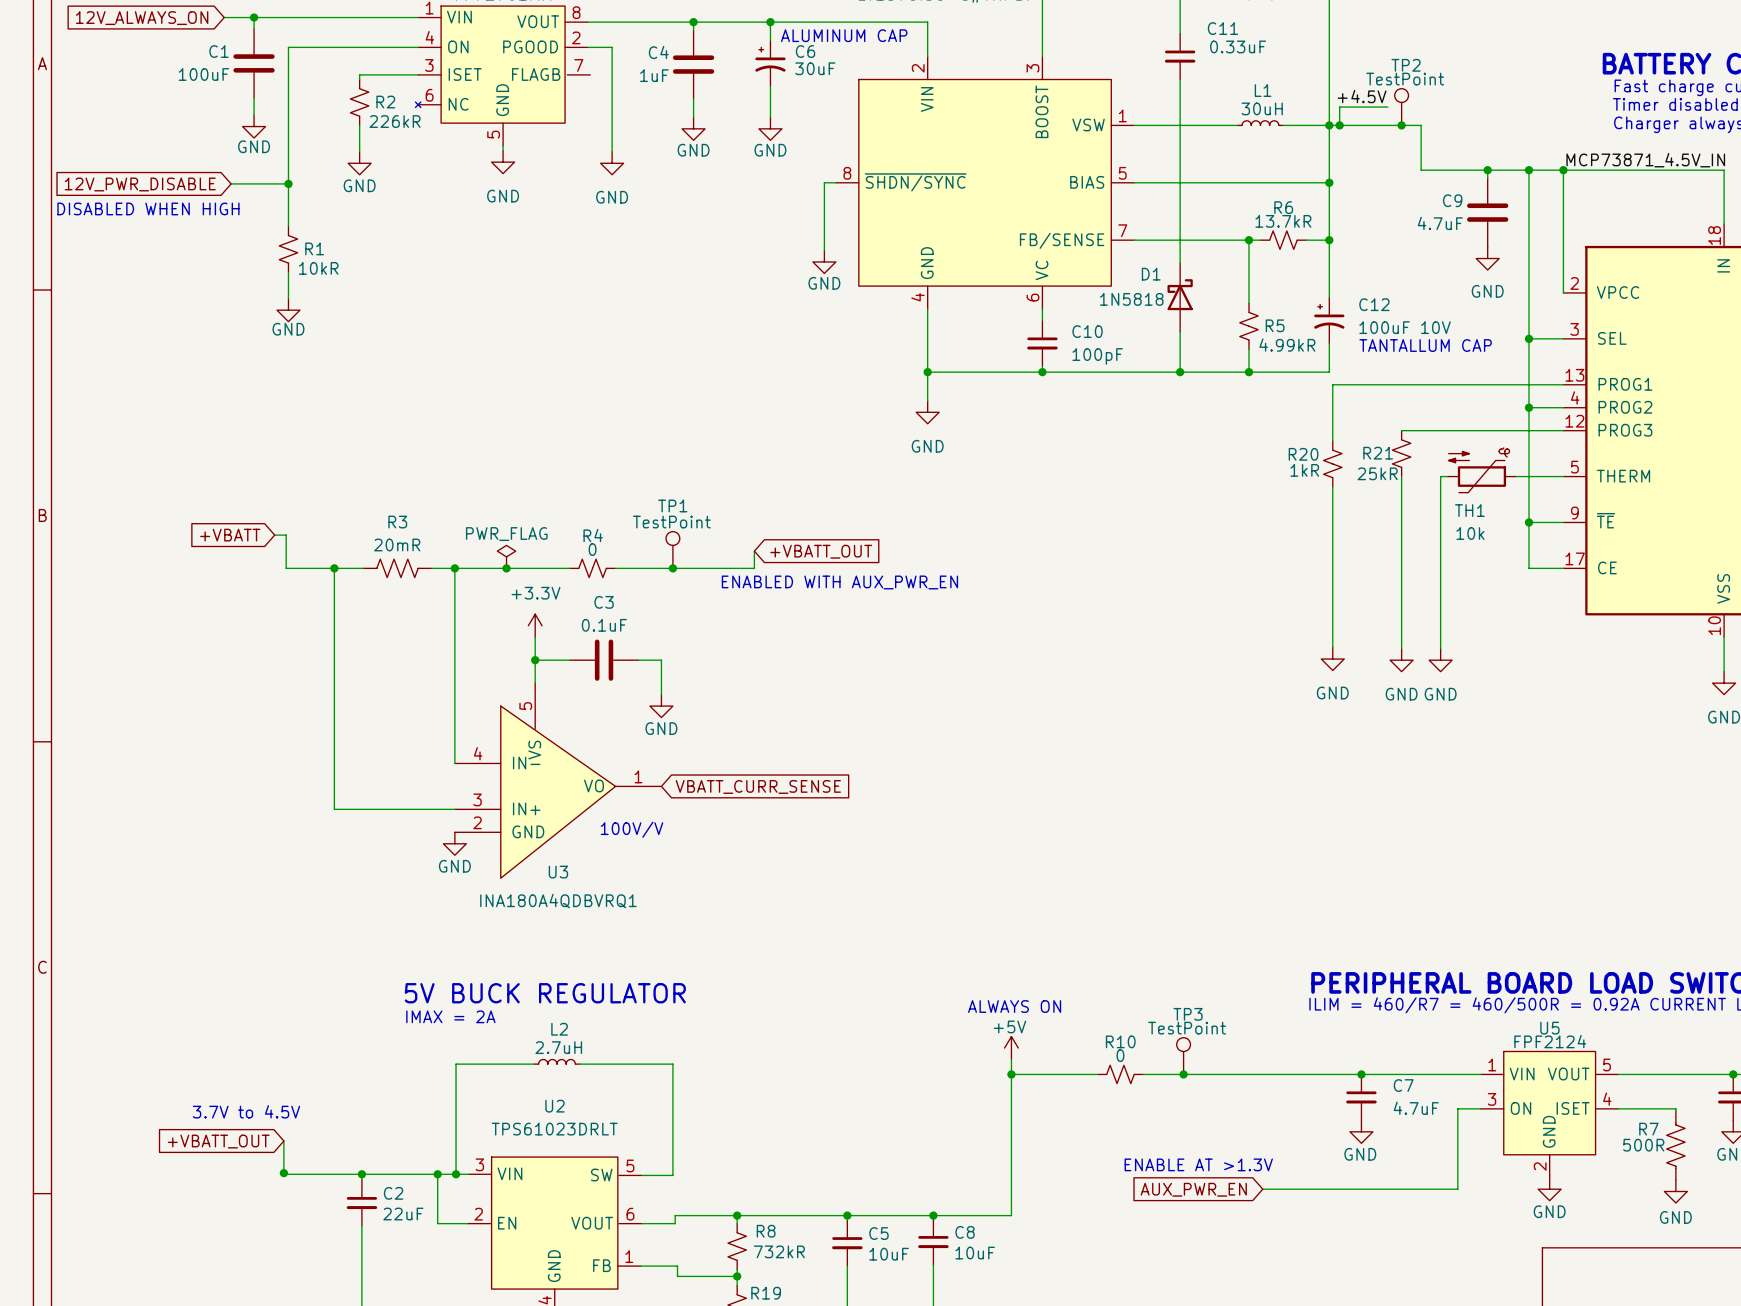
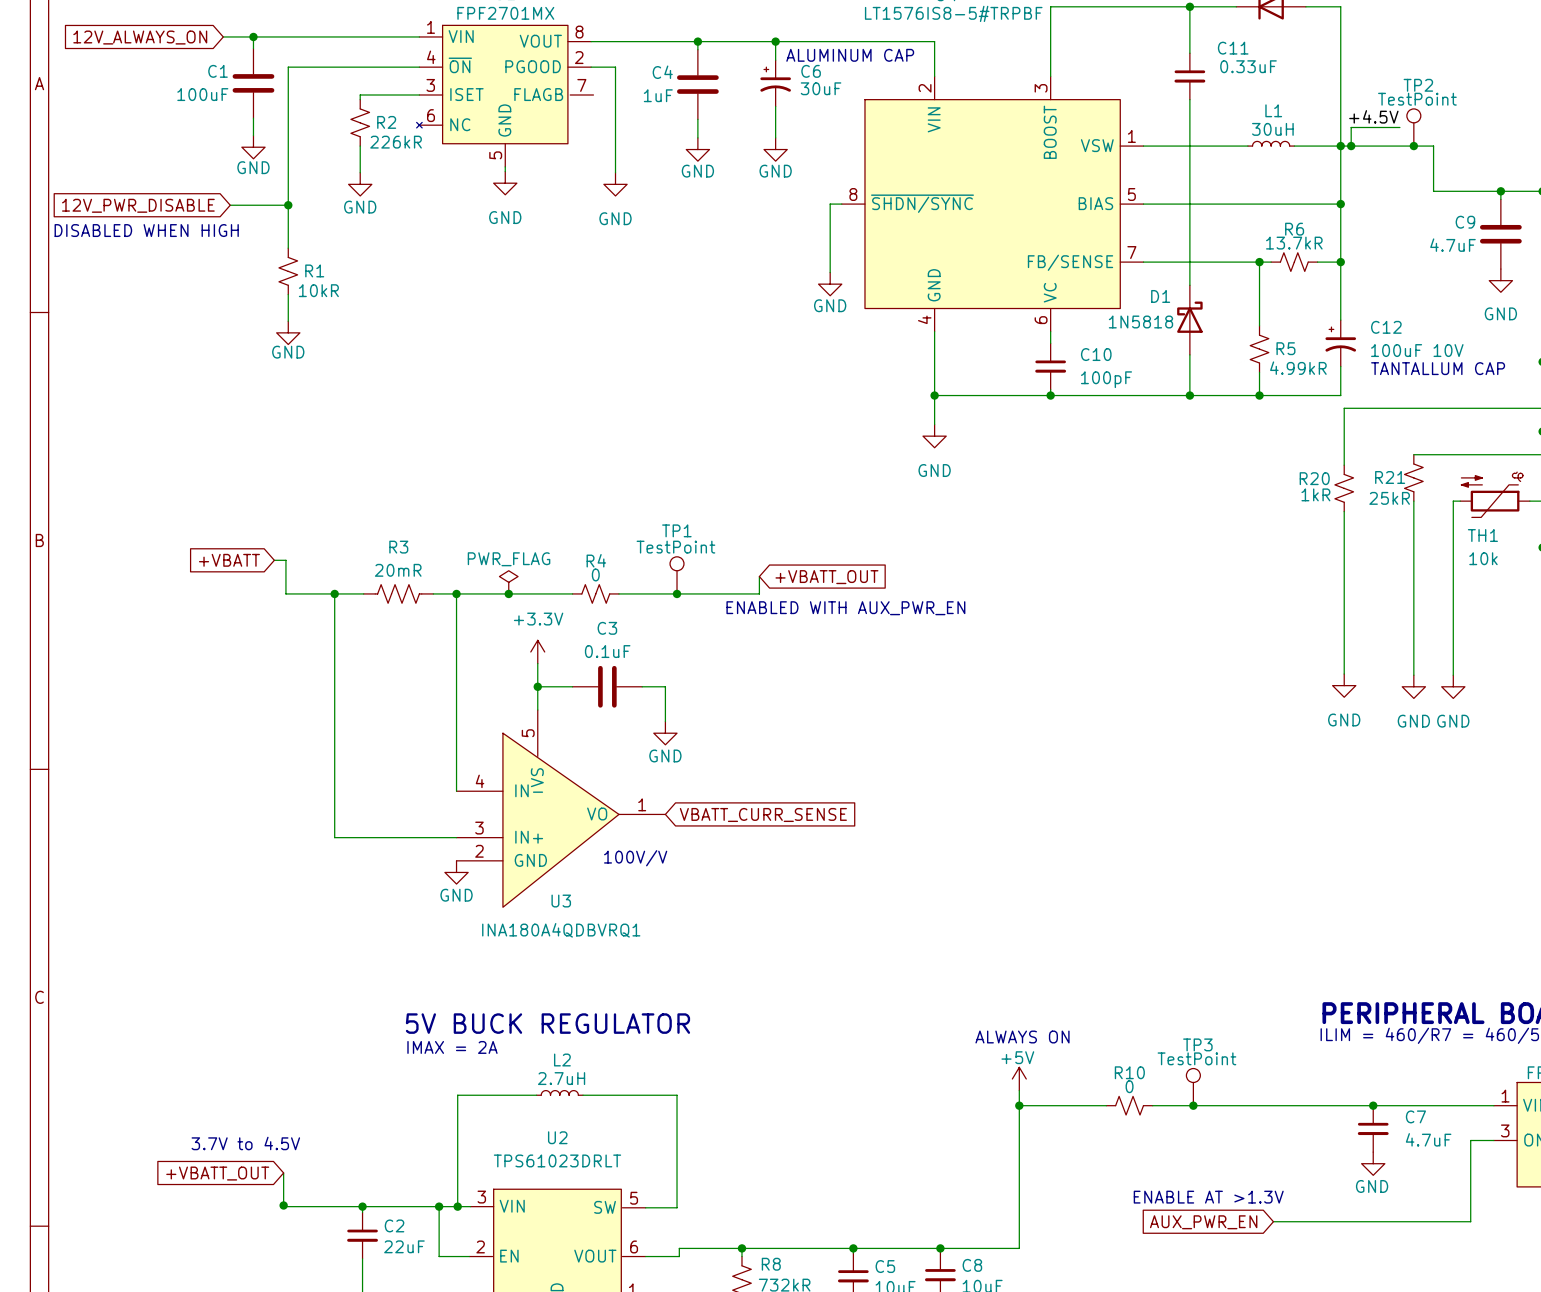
part pin name: ON (458, 46) -> ~{ON} (460, 65)

